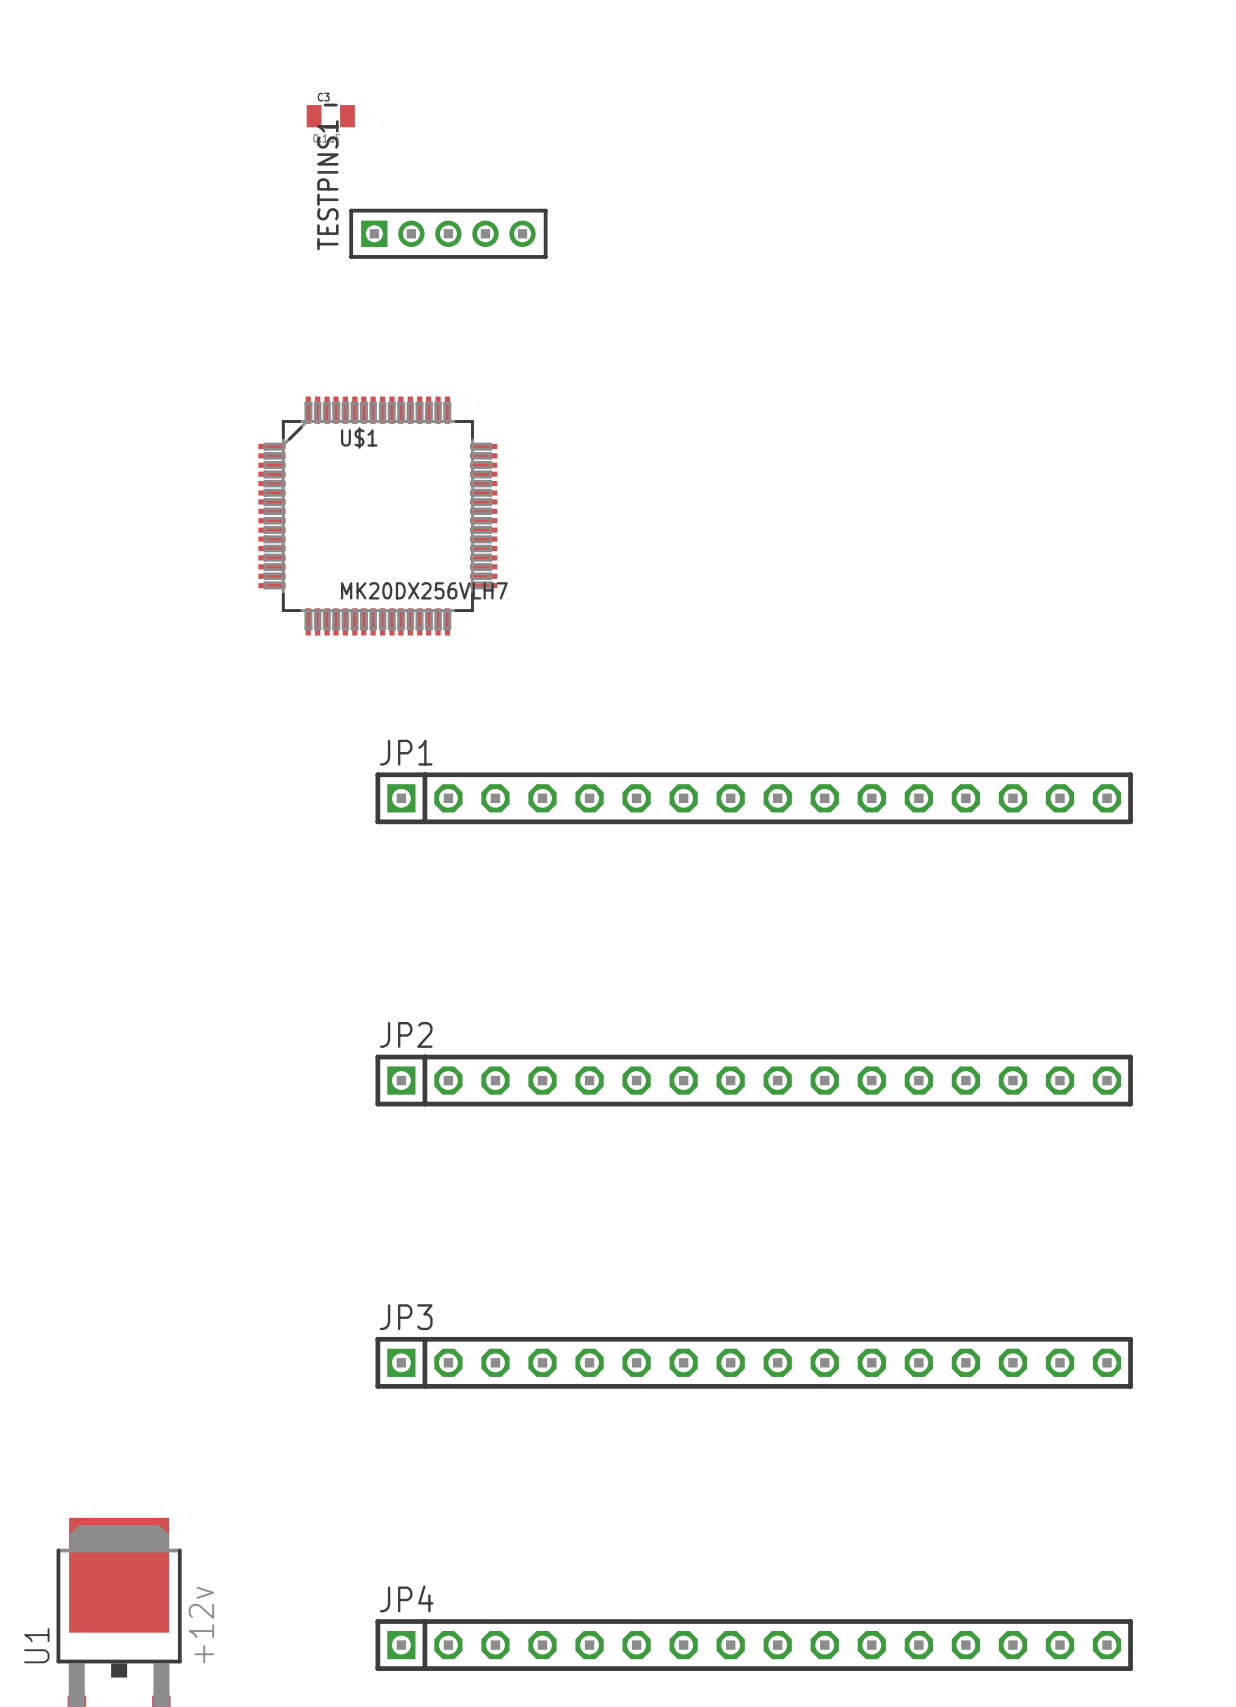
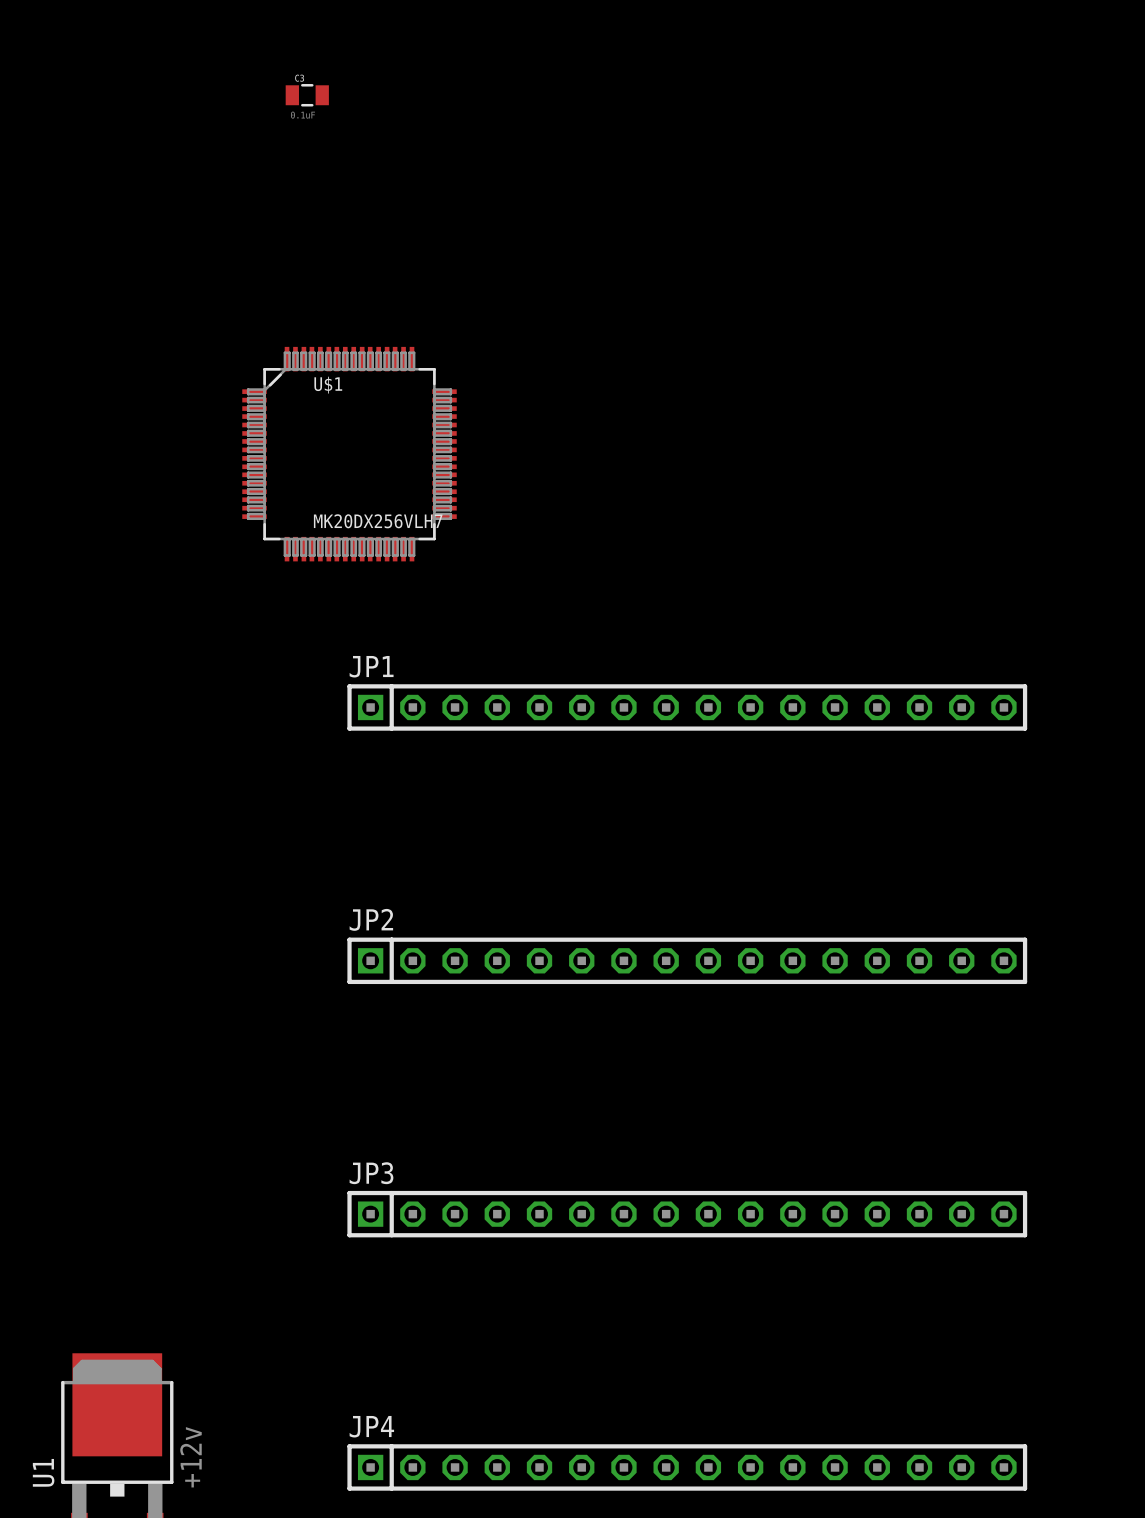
TESTPINS1: (448, 233) -> none

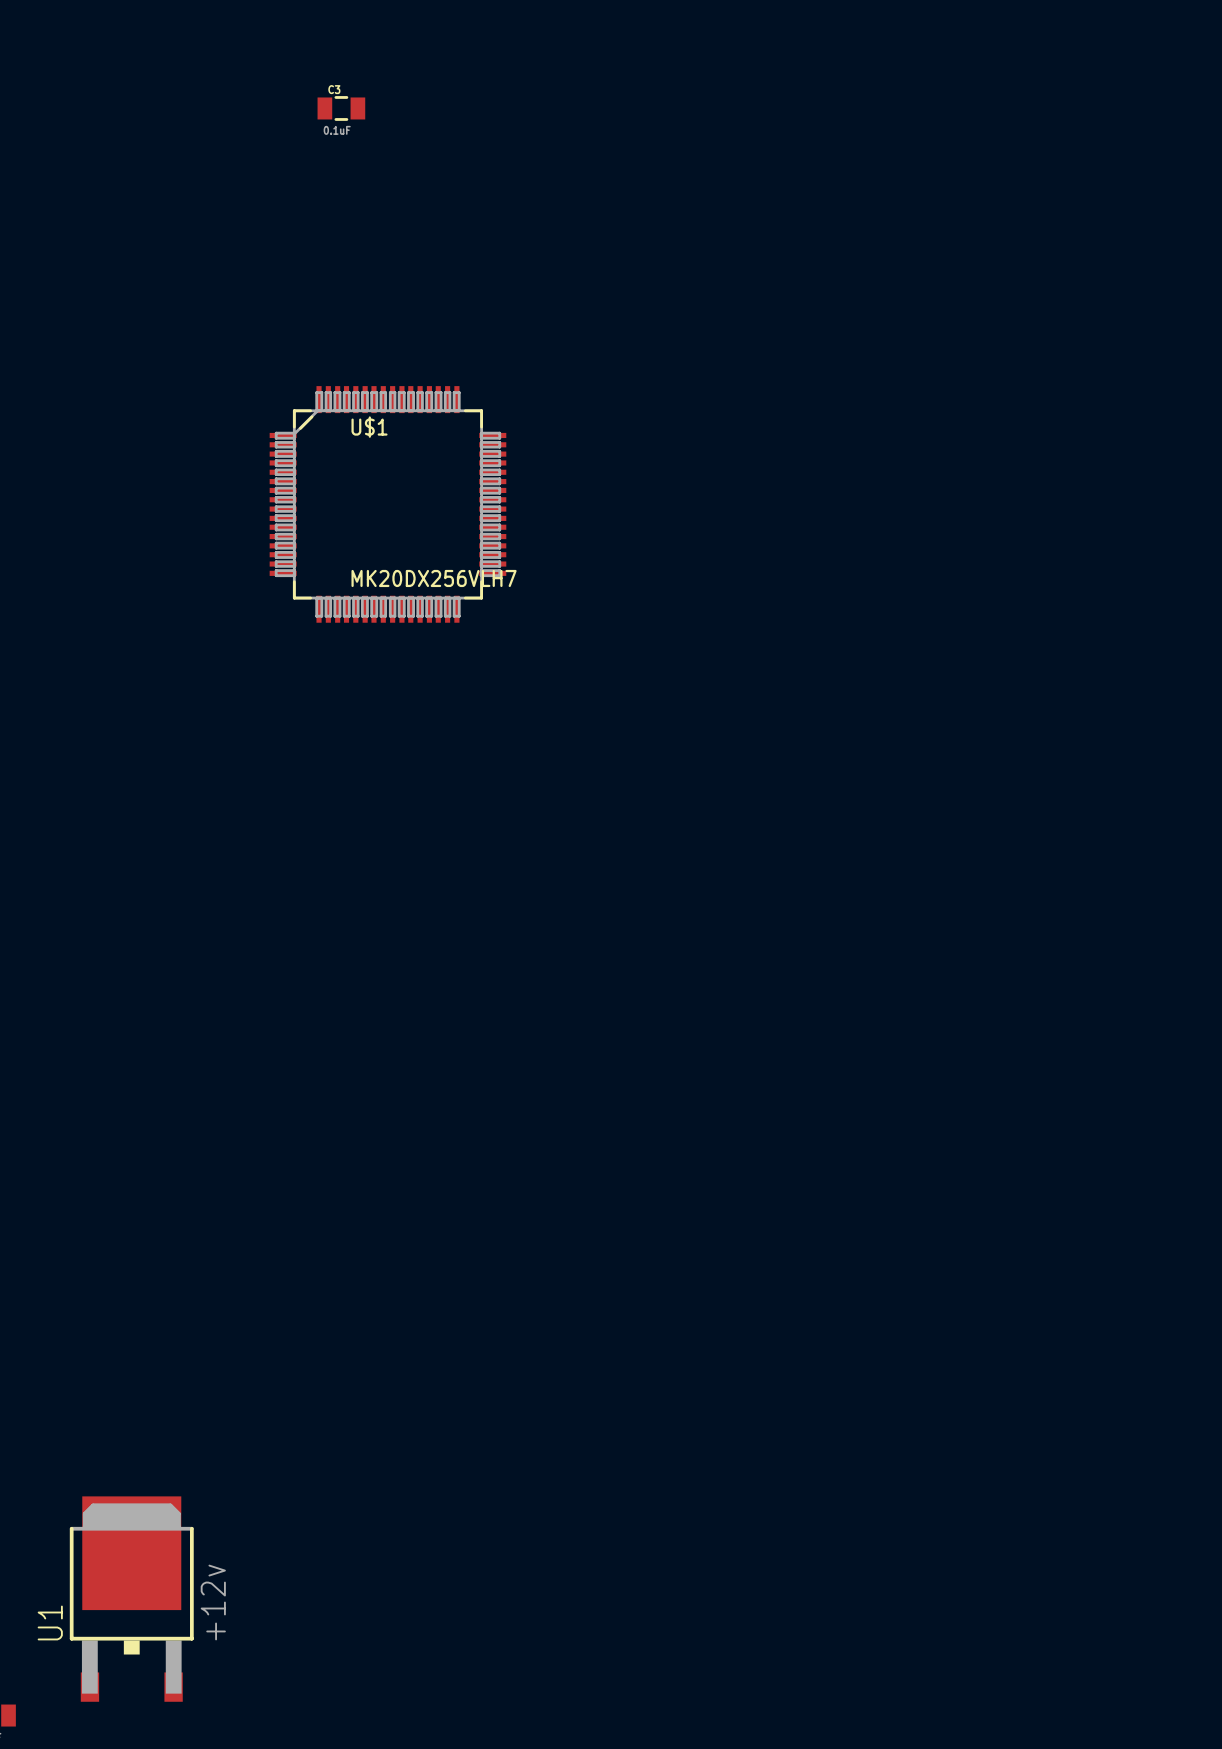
JP1: (687, 707) -> none
JP2: (687, 960) -> none
JP3: (687, 1214) -> none
JP4: (687, 1467) -> none

